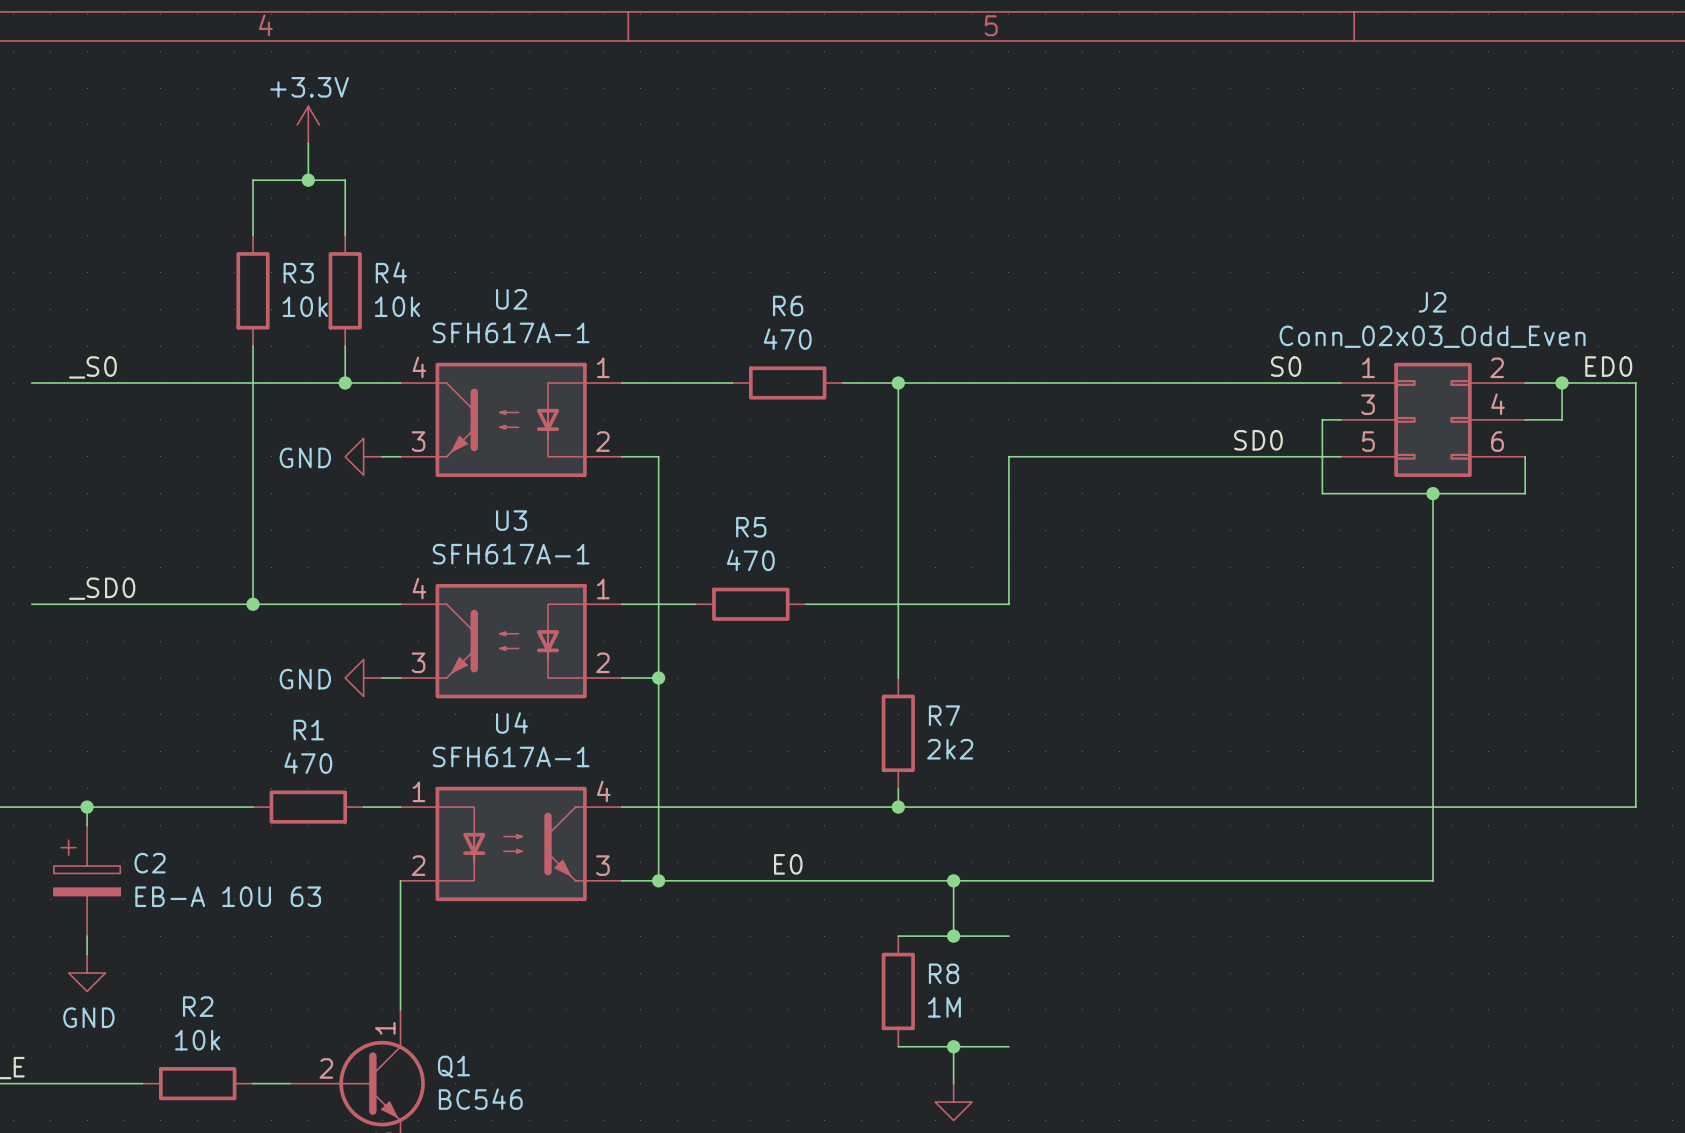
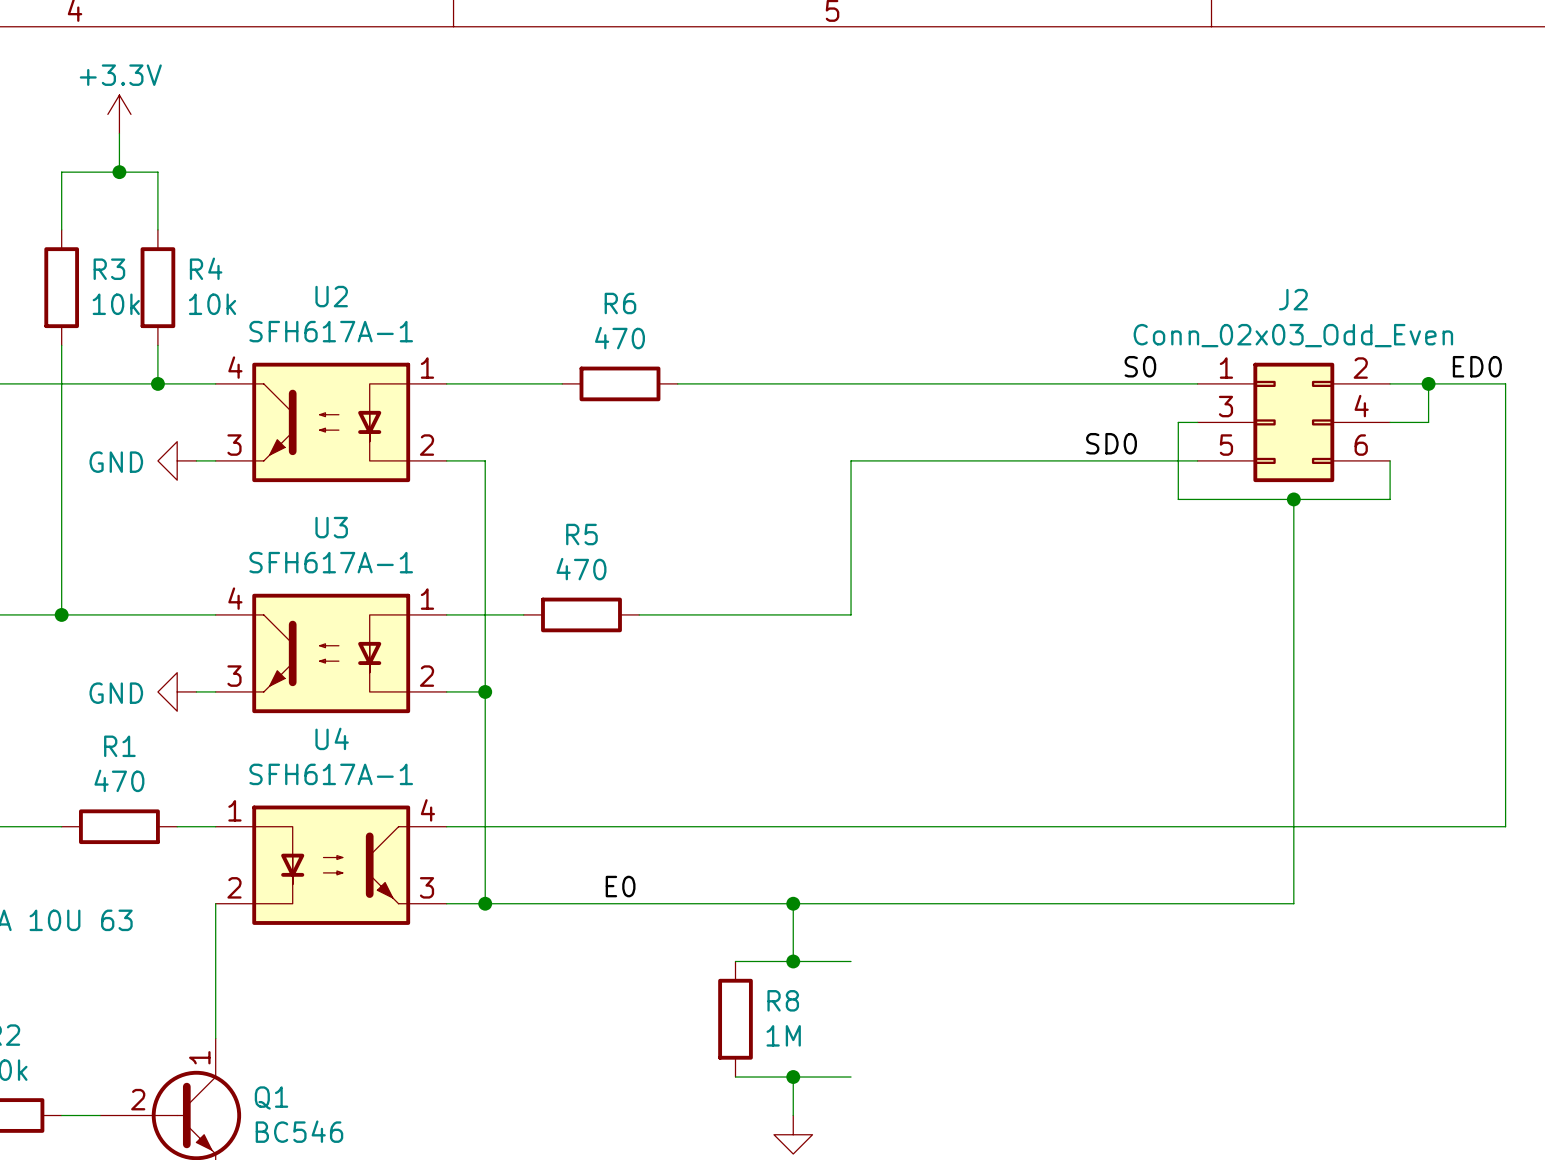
wire: (898, 383) (898, 678) -> none
junction: (898, 383) -> none
R7: 2k2 (898, 733) -> none
wire: (898, 788) (898, 807) -> none
junction: (898, 807) -> none

